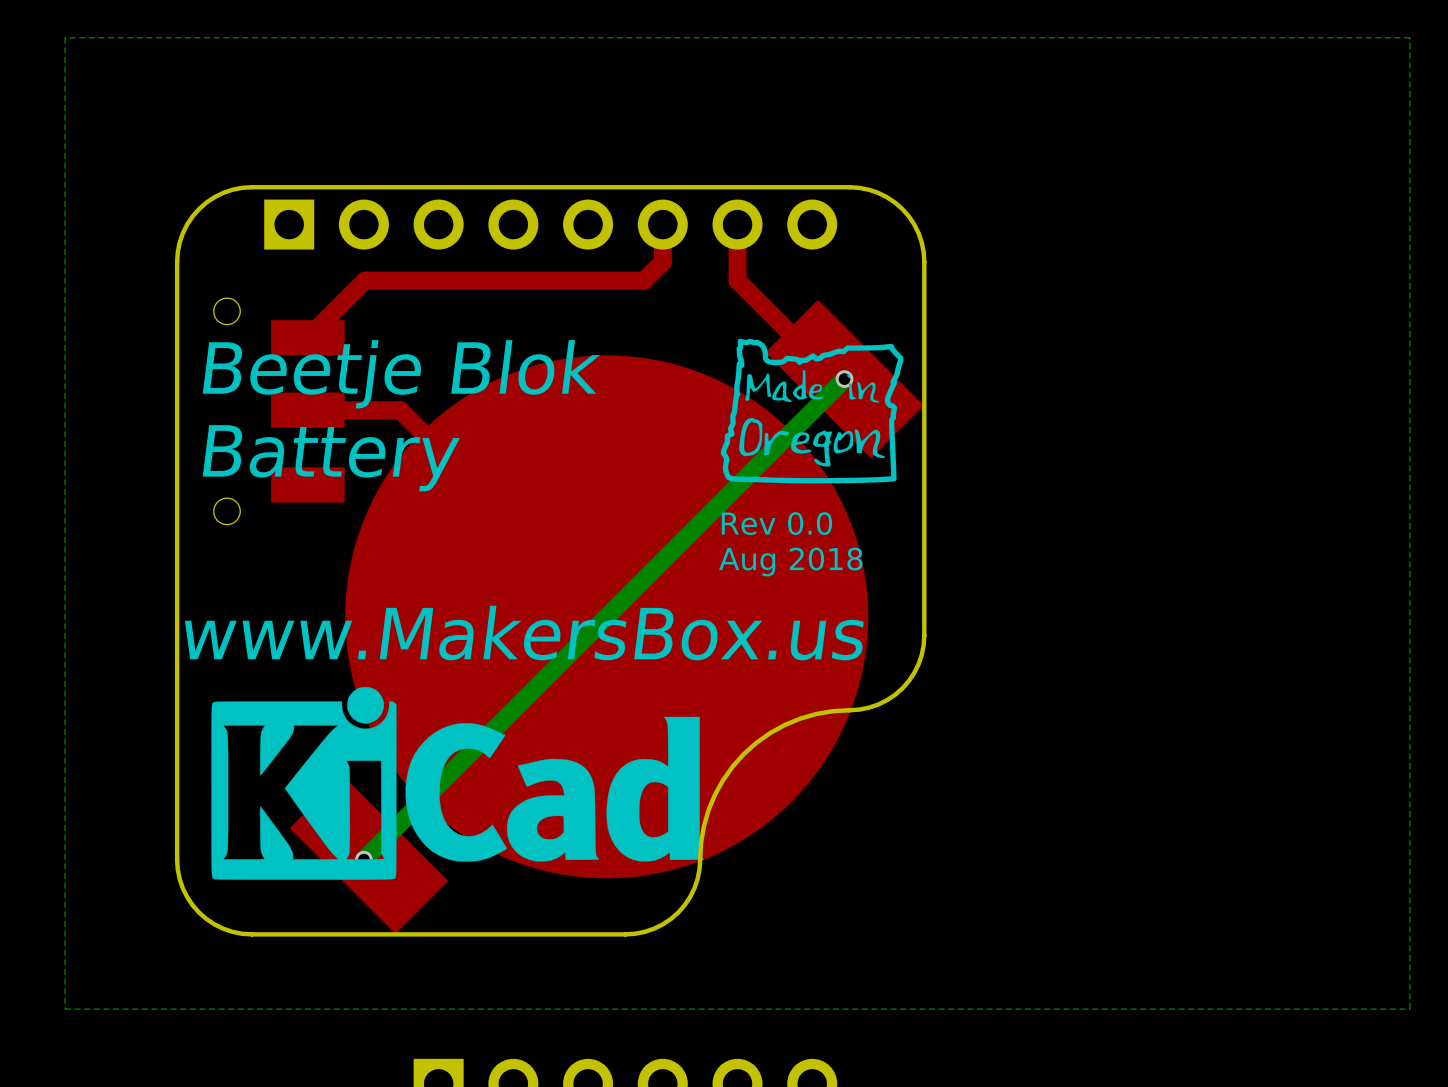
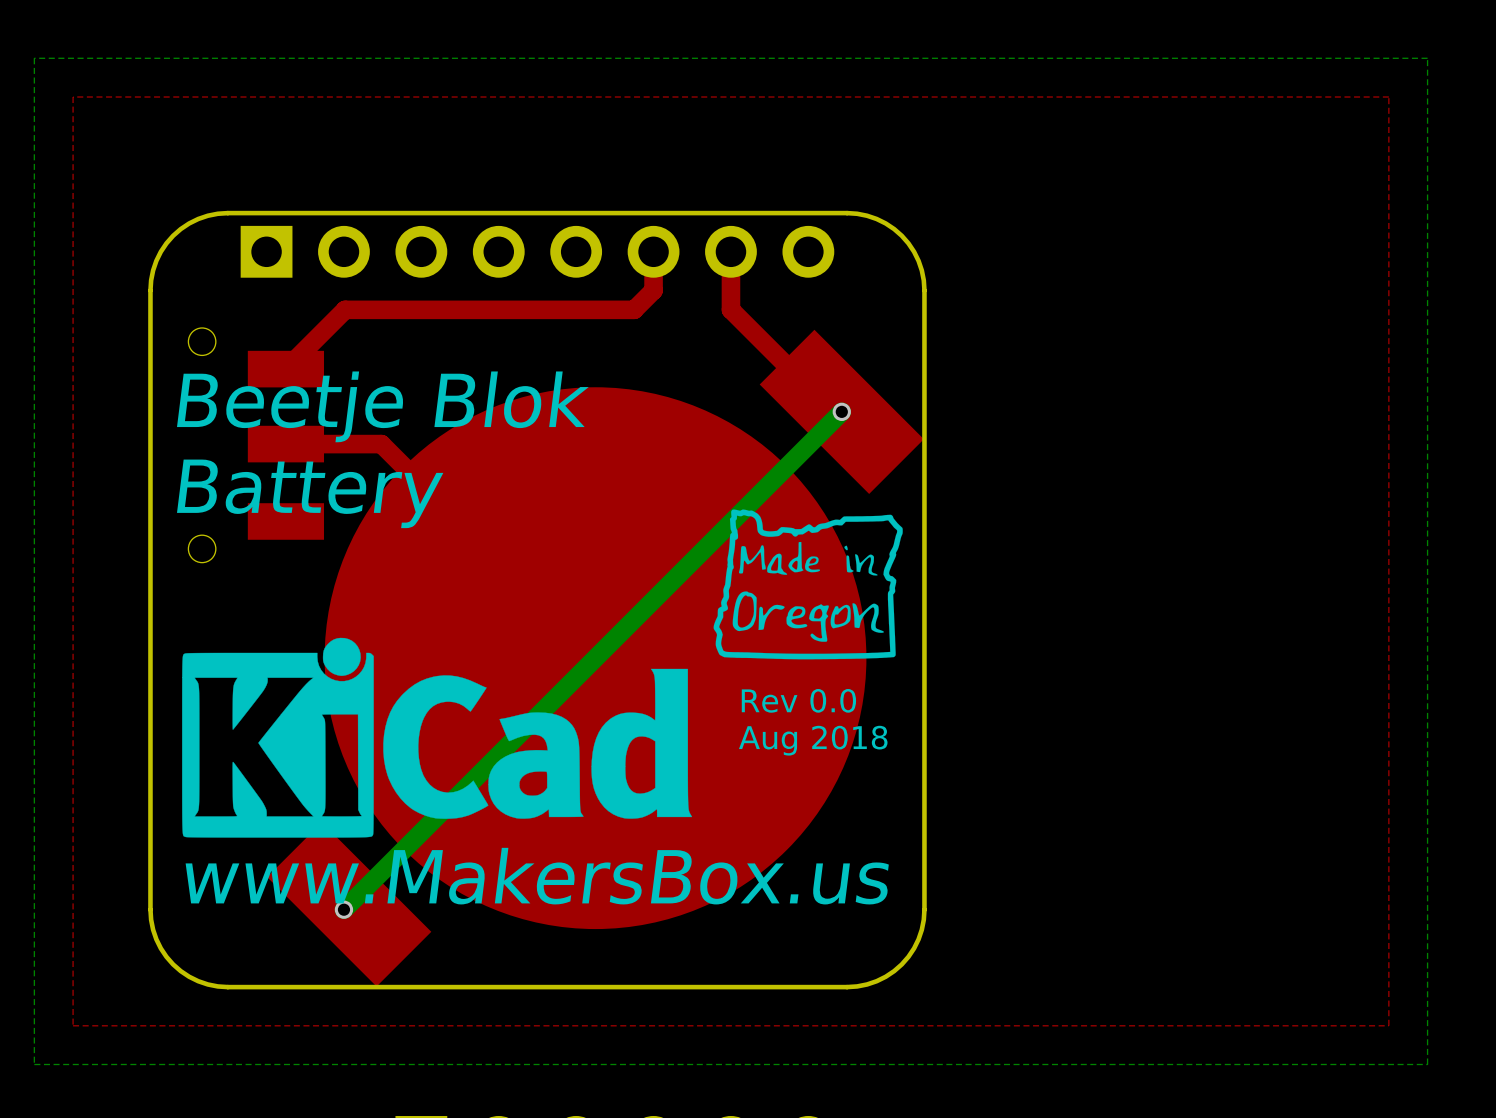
top zone outline: none -> (1388, 97) (1388, 1025) (73, 1025) (73, 97) (1388, 97)
drawing position: (812, 411) -> (808, 584)
text position: Rev 0.0 (776, 523) -> Rev 0.0 (798, 700)
text position: Aug 2018 (790, 562) -> Aug 2018 (813, 740)
text position: www.MakersBox.us (524, 633) -> www.MakersBox.us (537, 876)
board edge: (924, 635) (921, 654) (914, 672) (902, 688) (886, 700) (868, 707) (832, 711) (800, 718) (770, 733) (743, 754) (723, 780) (708, 810) (701, 842) (697, 879) (690, 897) (678, 912) (662, 924) (644, 931) (625, 934) -> (924, 677) (923, 919) (918, 939) (901, 964) (885, 976) (857, 986) (614, 987)
drawing position: (457, 783) -> (437, 737)

